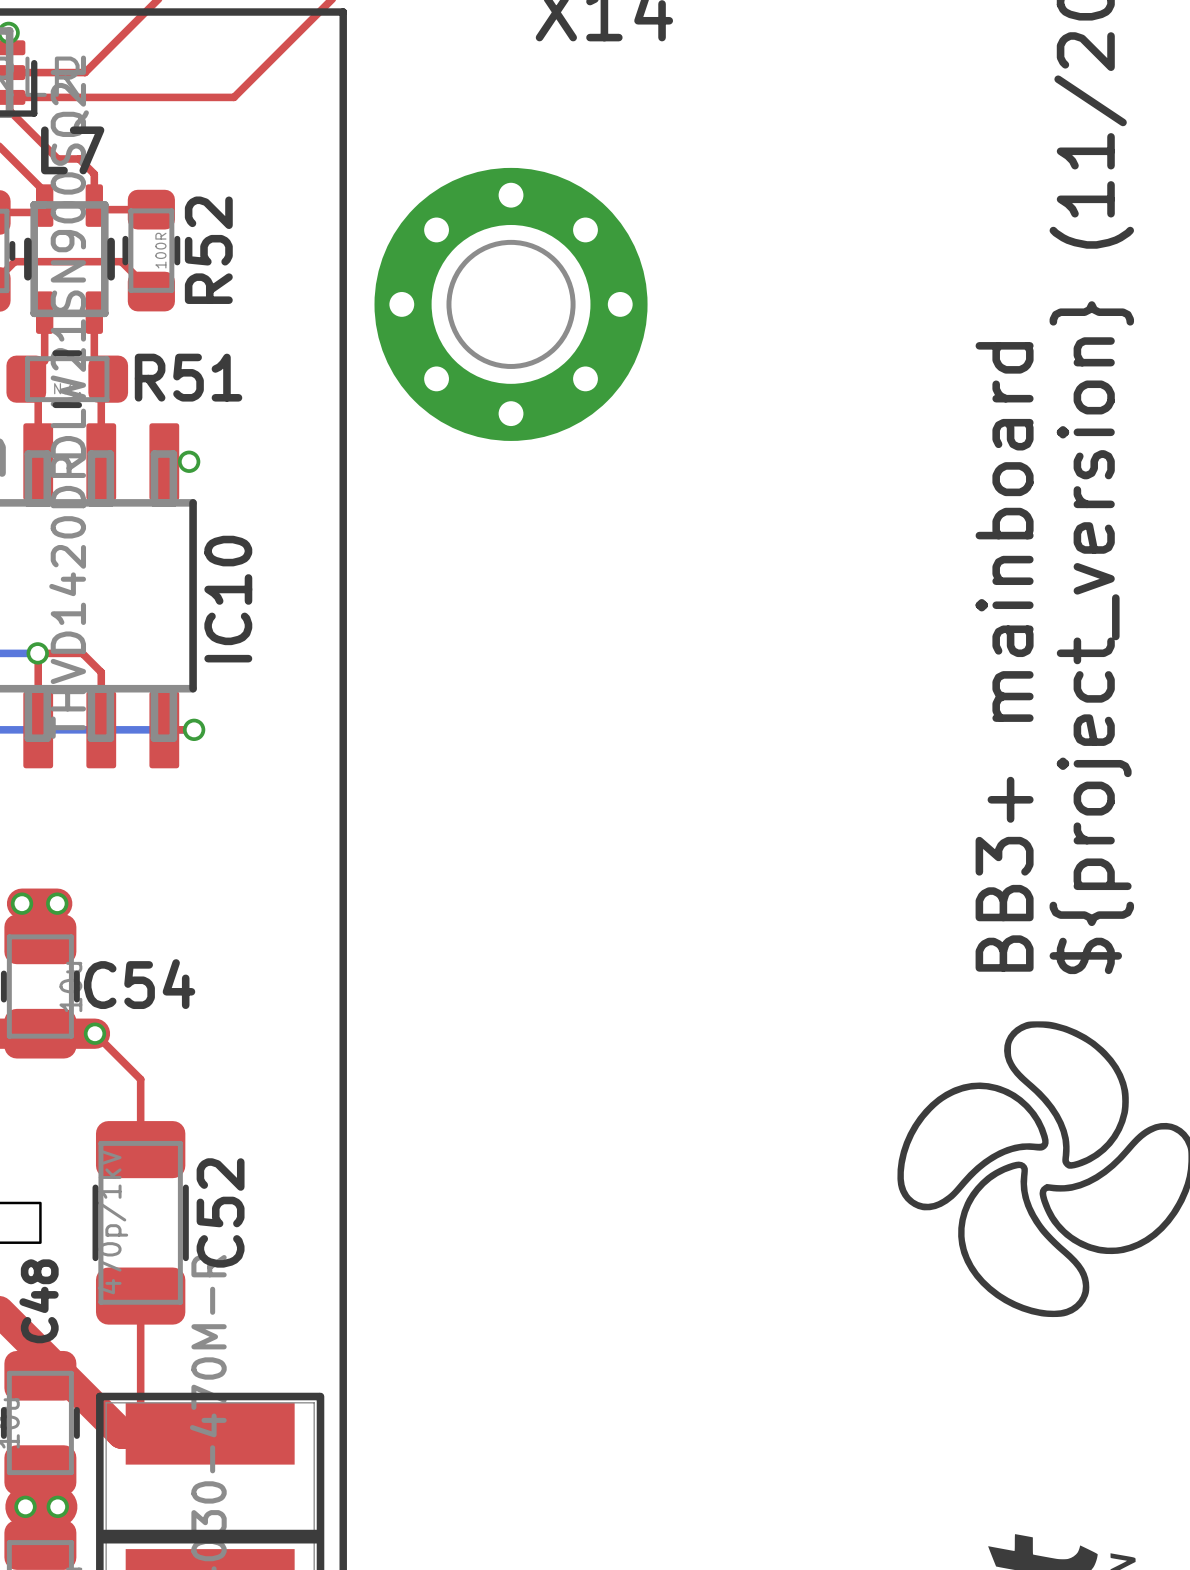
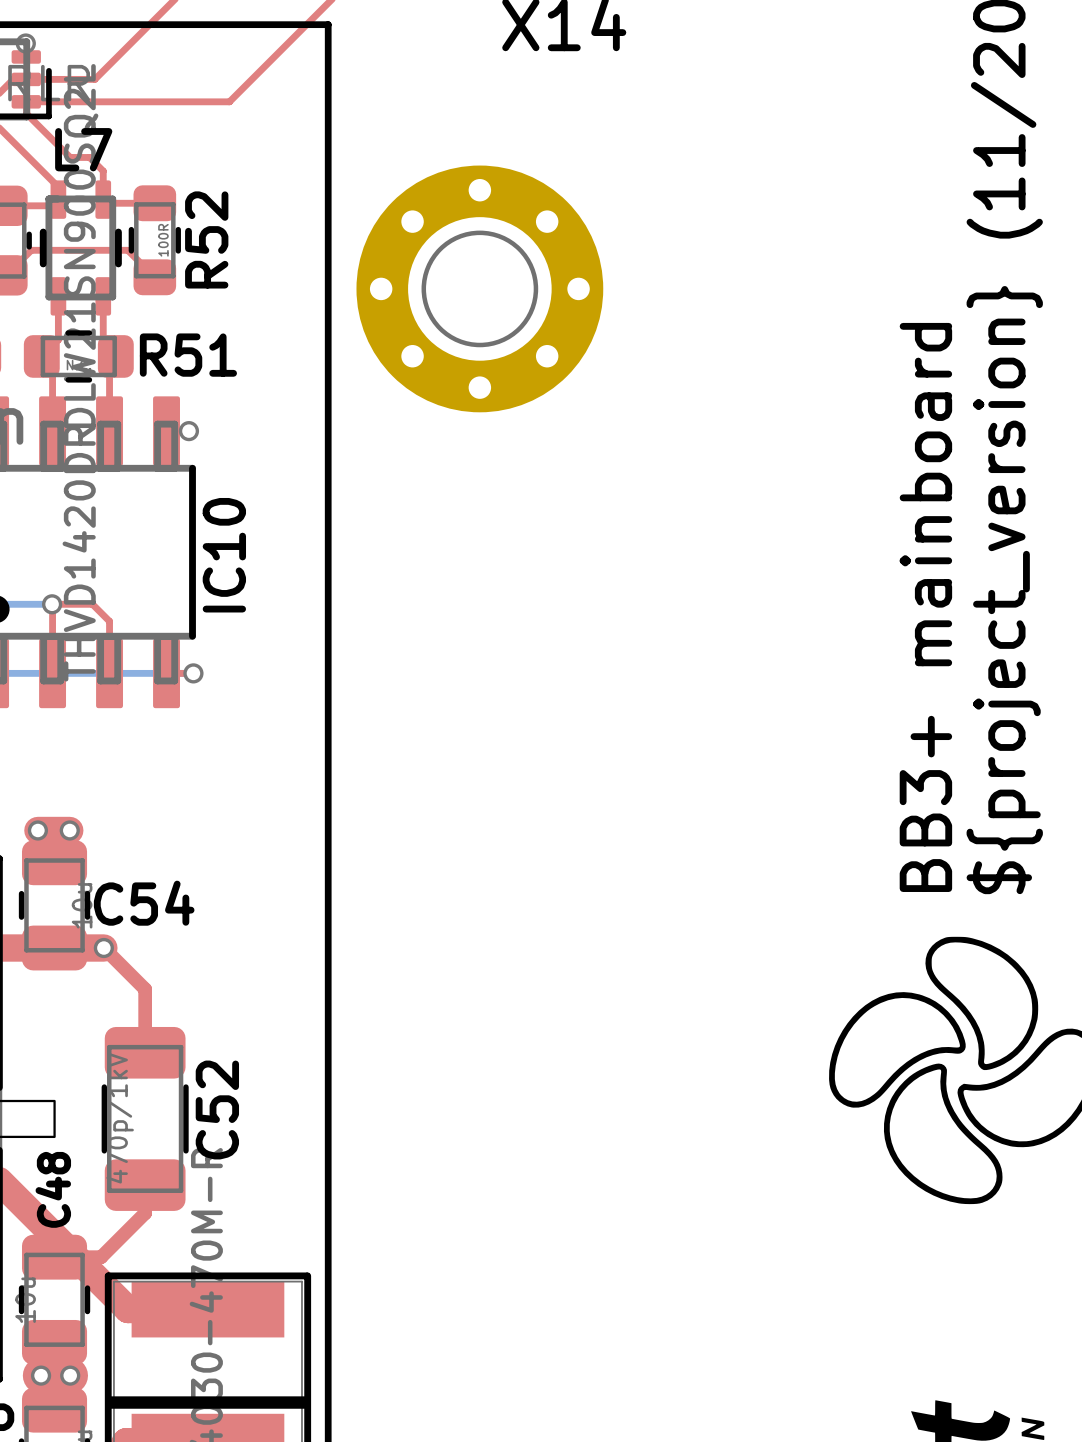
top track width: thin (94, 1033) (140, 1079) (140, 1149) -> thick (103, 948) (145, 989) (145, 1052)
top track: (140, 1327) (140, 1434) -> (145, 1213) (101, 1257) (54, 1257)

